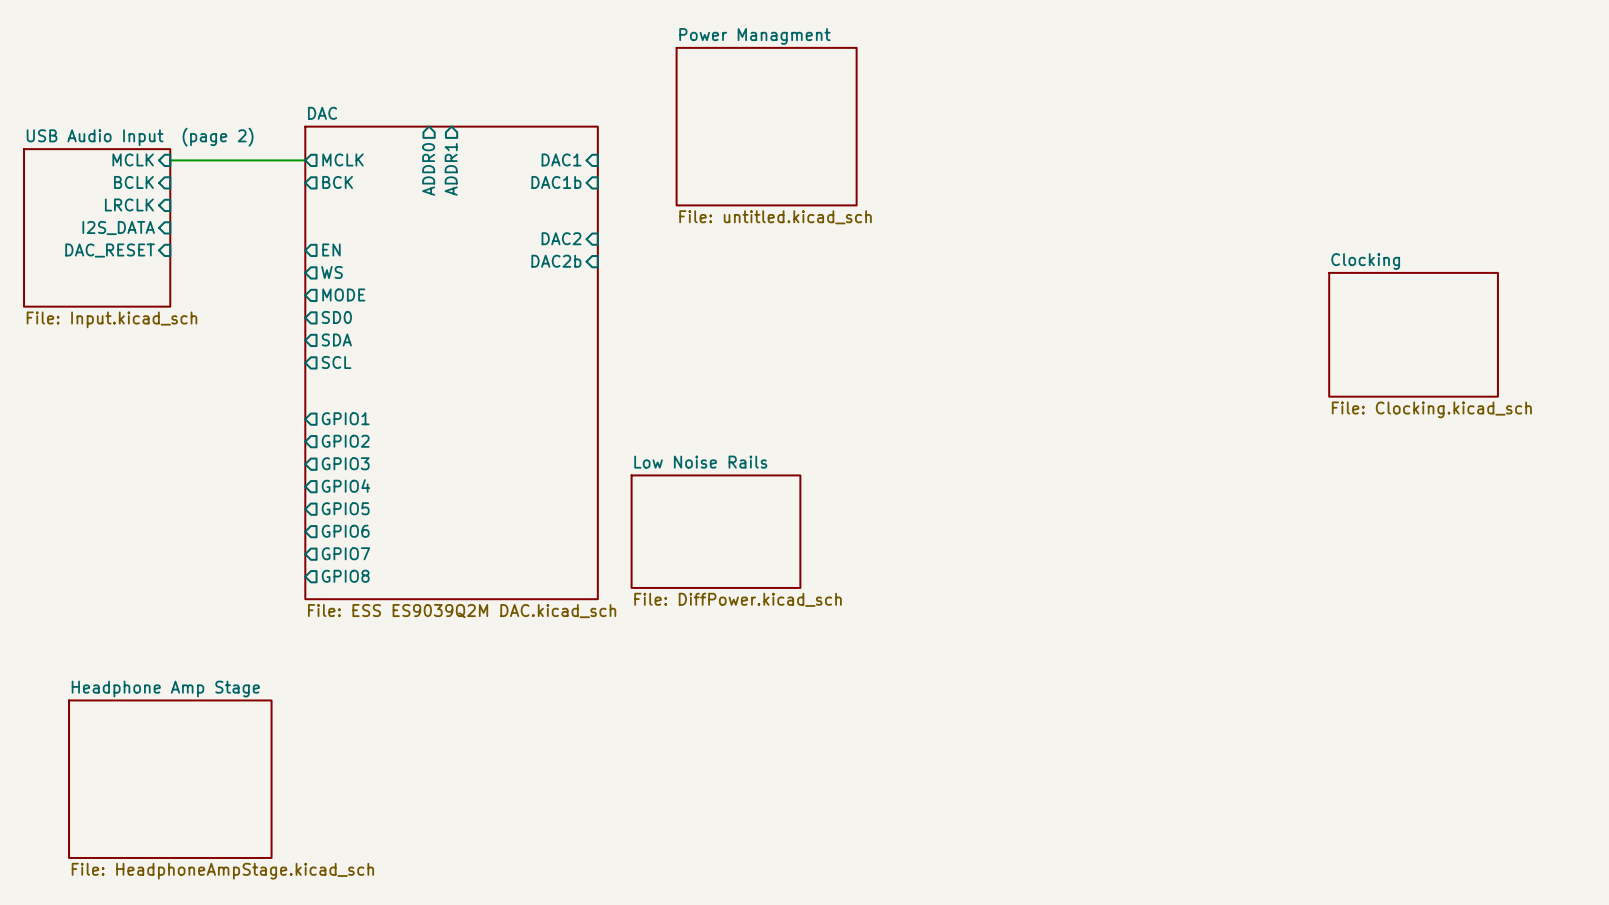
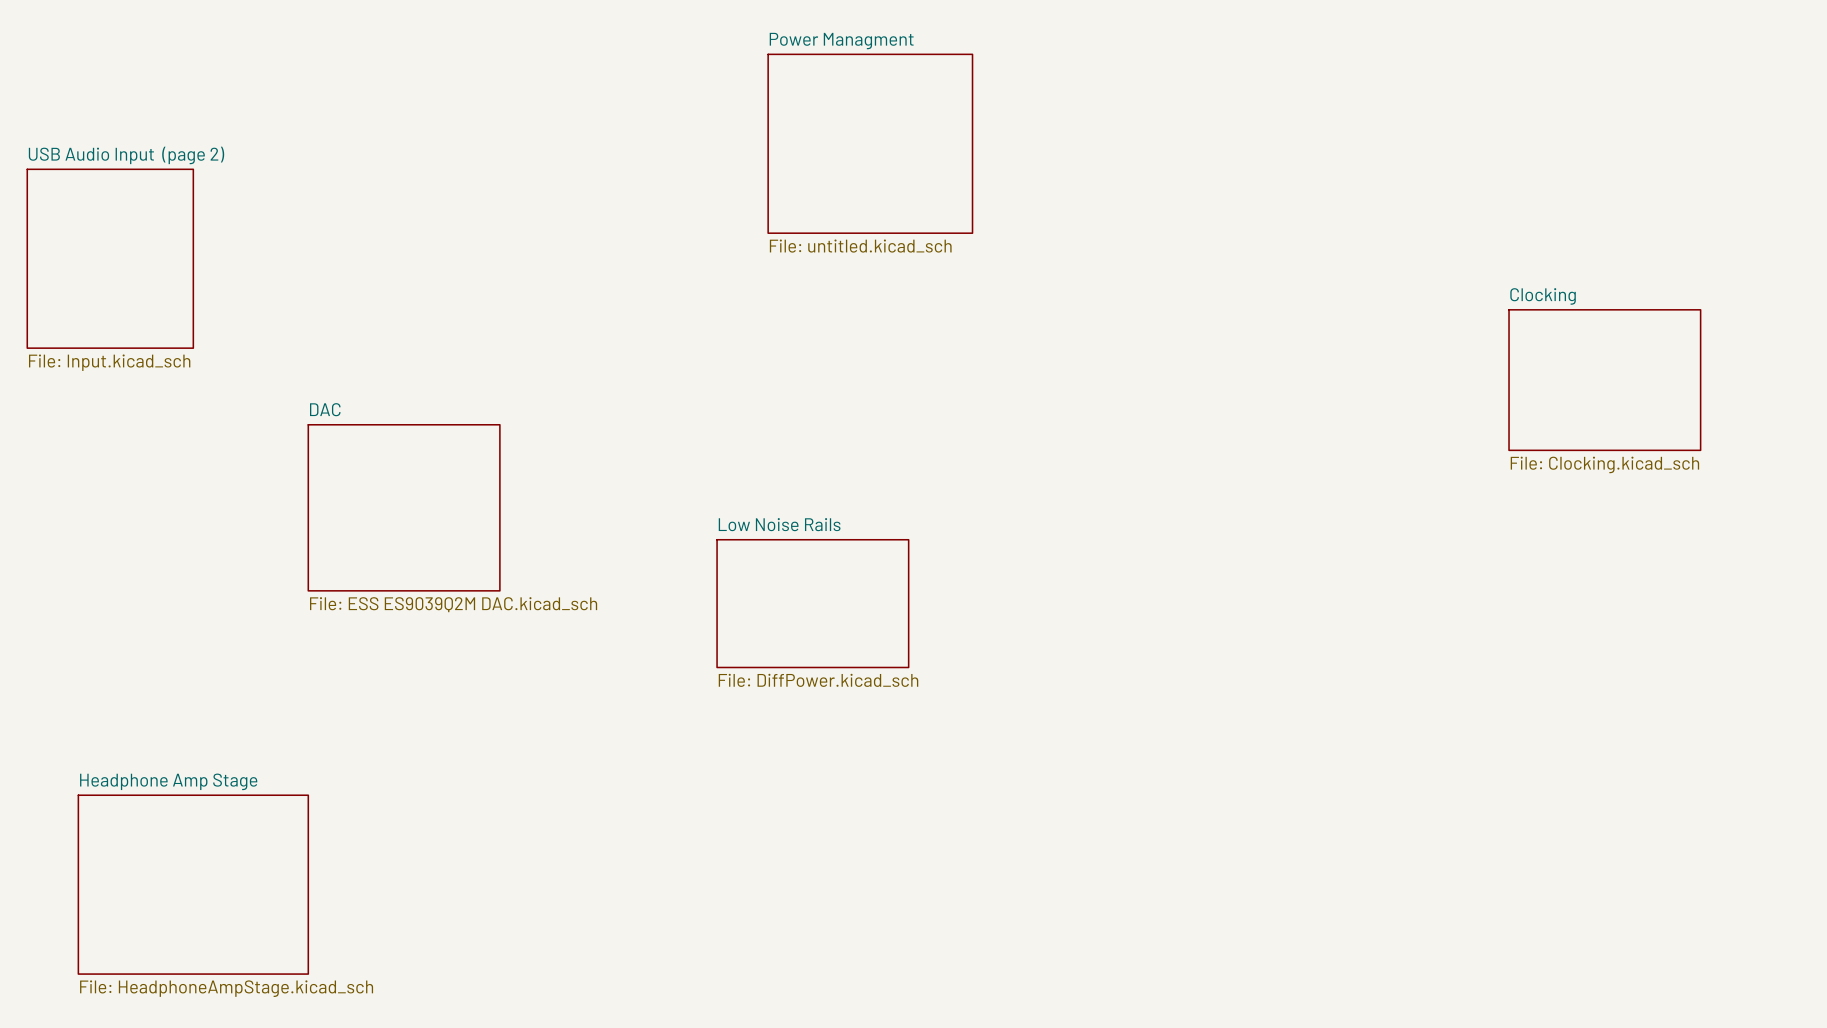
sheet pin: MCLK (133, 159) -> none
sheet pin: MCLK (342, 159) -> none
sheet pin: DAC1 (561, 159) -> none
wire: (170, 160) (305, 160) -> none
sheet pin: ADDR0 (428, 169) -> none
sheet pin: ADDR1 (451, 169) -> none
sheet pin: BCLK (133, 182) -> none
sheet pin: BCK (337, 182) -> none
sheet pin: DAC1b (556, 182) -> none
sheet pin: LRCLK (129, 204) -> none
sheet pin: I2S_DATA (118, 228) -> none
sheet pin: DAC2 (561, 238) -> none
sheet pin: EN (331, 249) -> none
sheet pin: DAC_RESET (110, 250) -> none
sheet pin: DAC2b (556, 261) -> none
sheet pin: WS (332, 272) -> none
sheet pin: MODE (343, 294) -> none
sheet pin: SD0 (336, 317) -> none
sheet pin: SDA (336, 339) -> none
sheet pin: SCL (336, 362) -> none
sheet DAC: File: ESS ES9039Q2M DAC.kicad_sch (451, 362) -> none
sheet pin: GPIO1 (345, 418) -> none
sheet pin: GPIO2 (345, 441) -> none
sheet DAC: none -> File: ESS ES9039Q2M DAC.kicad_sch (404, 507)
sheet pin: GPIO3 (345, 463) -> none
sheet pin: GPIO4 (345, 485) -> none
sheet pin: GPIO5 (345, 508) -> none
sheet pin: GPIO6 (345, 531) -> none
sheet pin: GPIO7 (345, 553) -> none
sheet pin: GPIO8 (345, 576) -> none

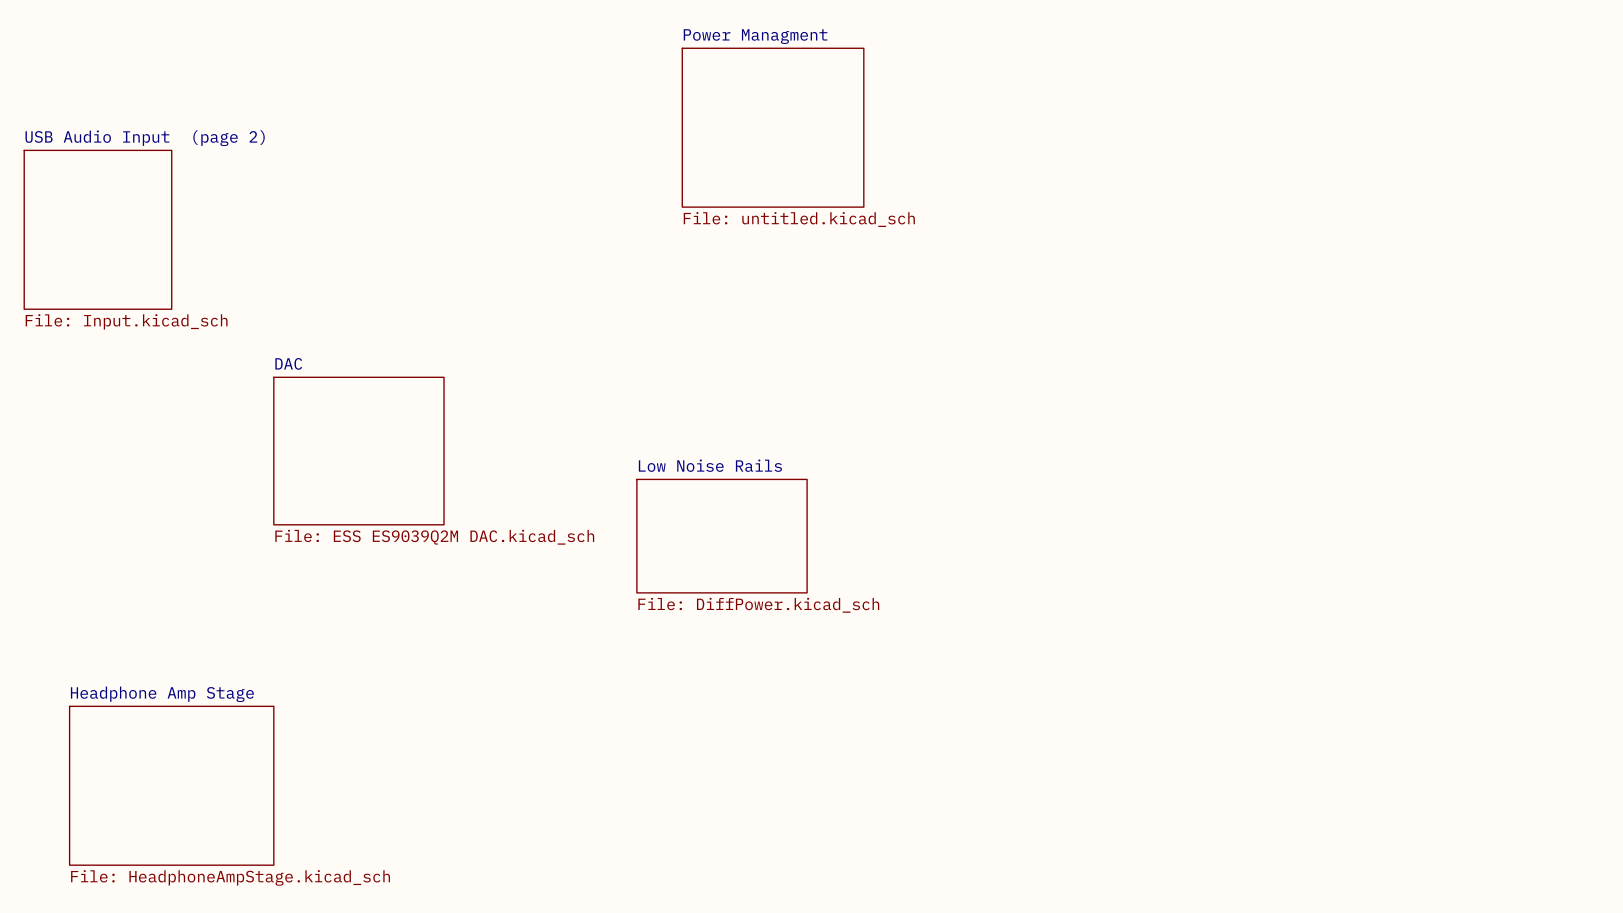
sheet Clocking: File: Clocking.kicad_sch (1604, 380) -> none

